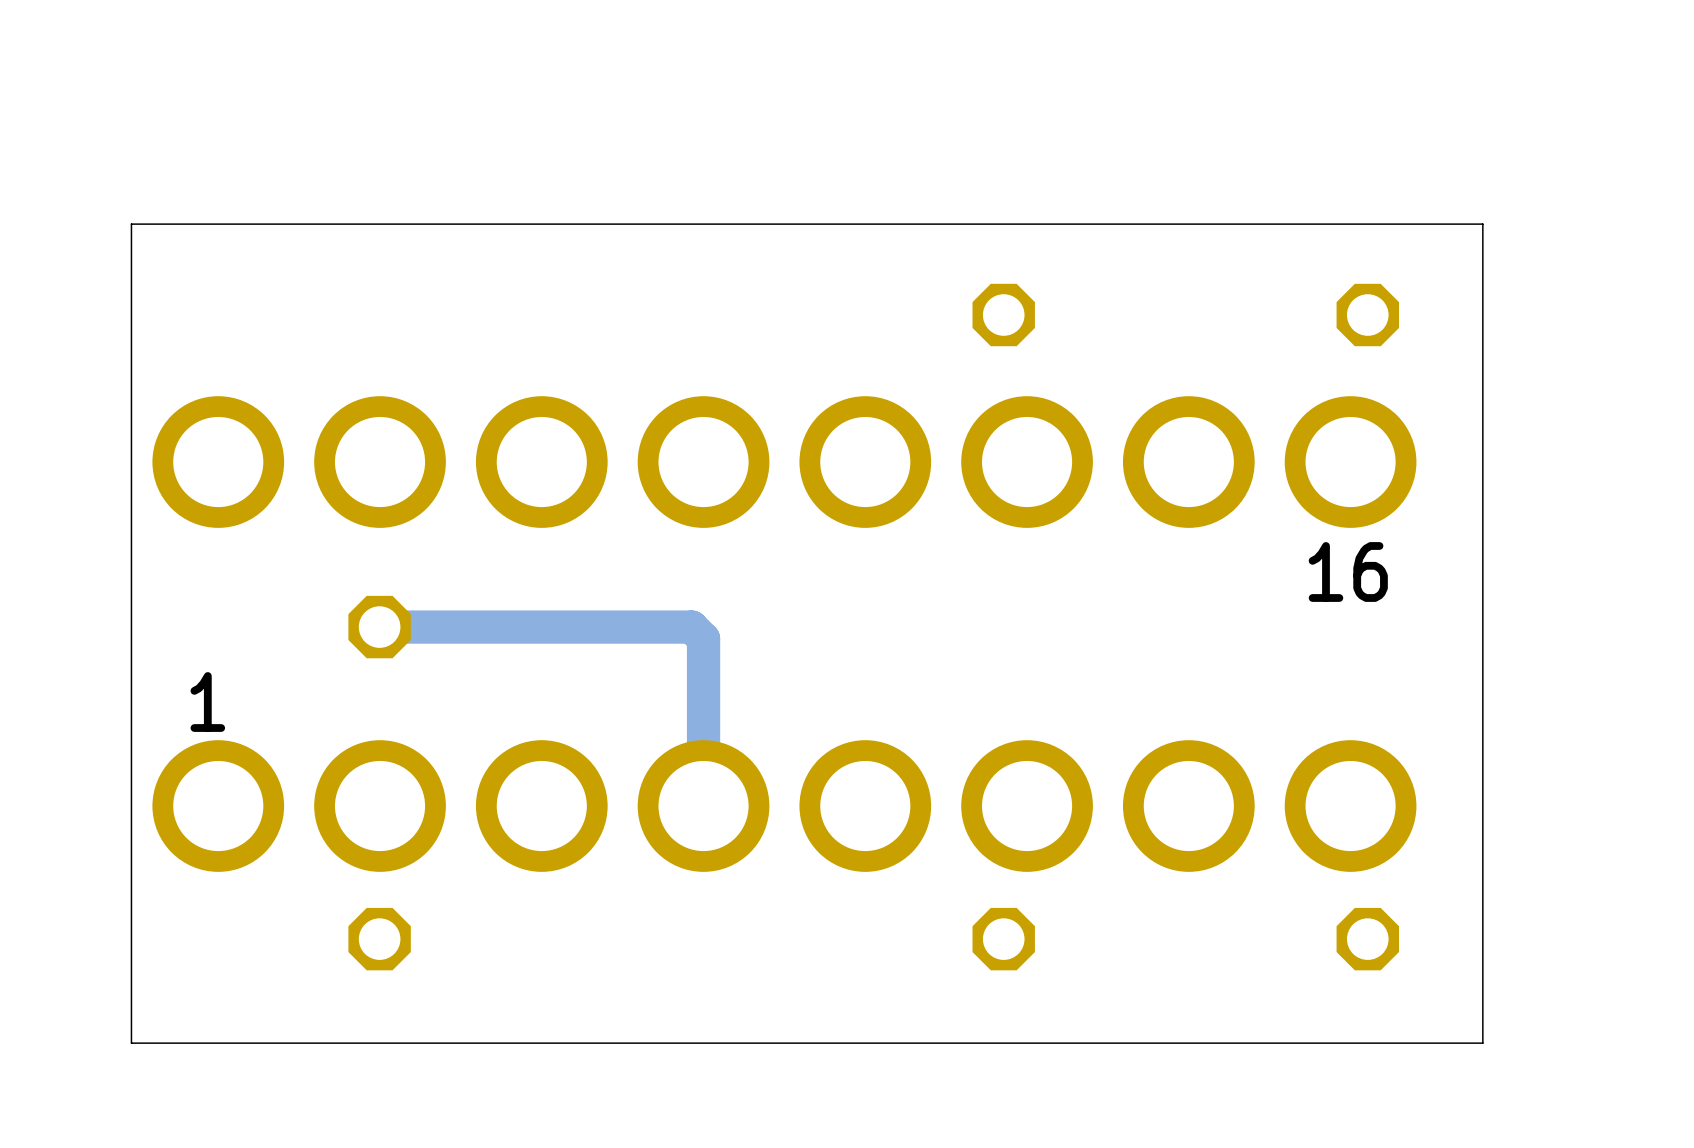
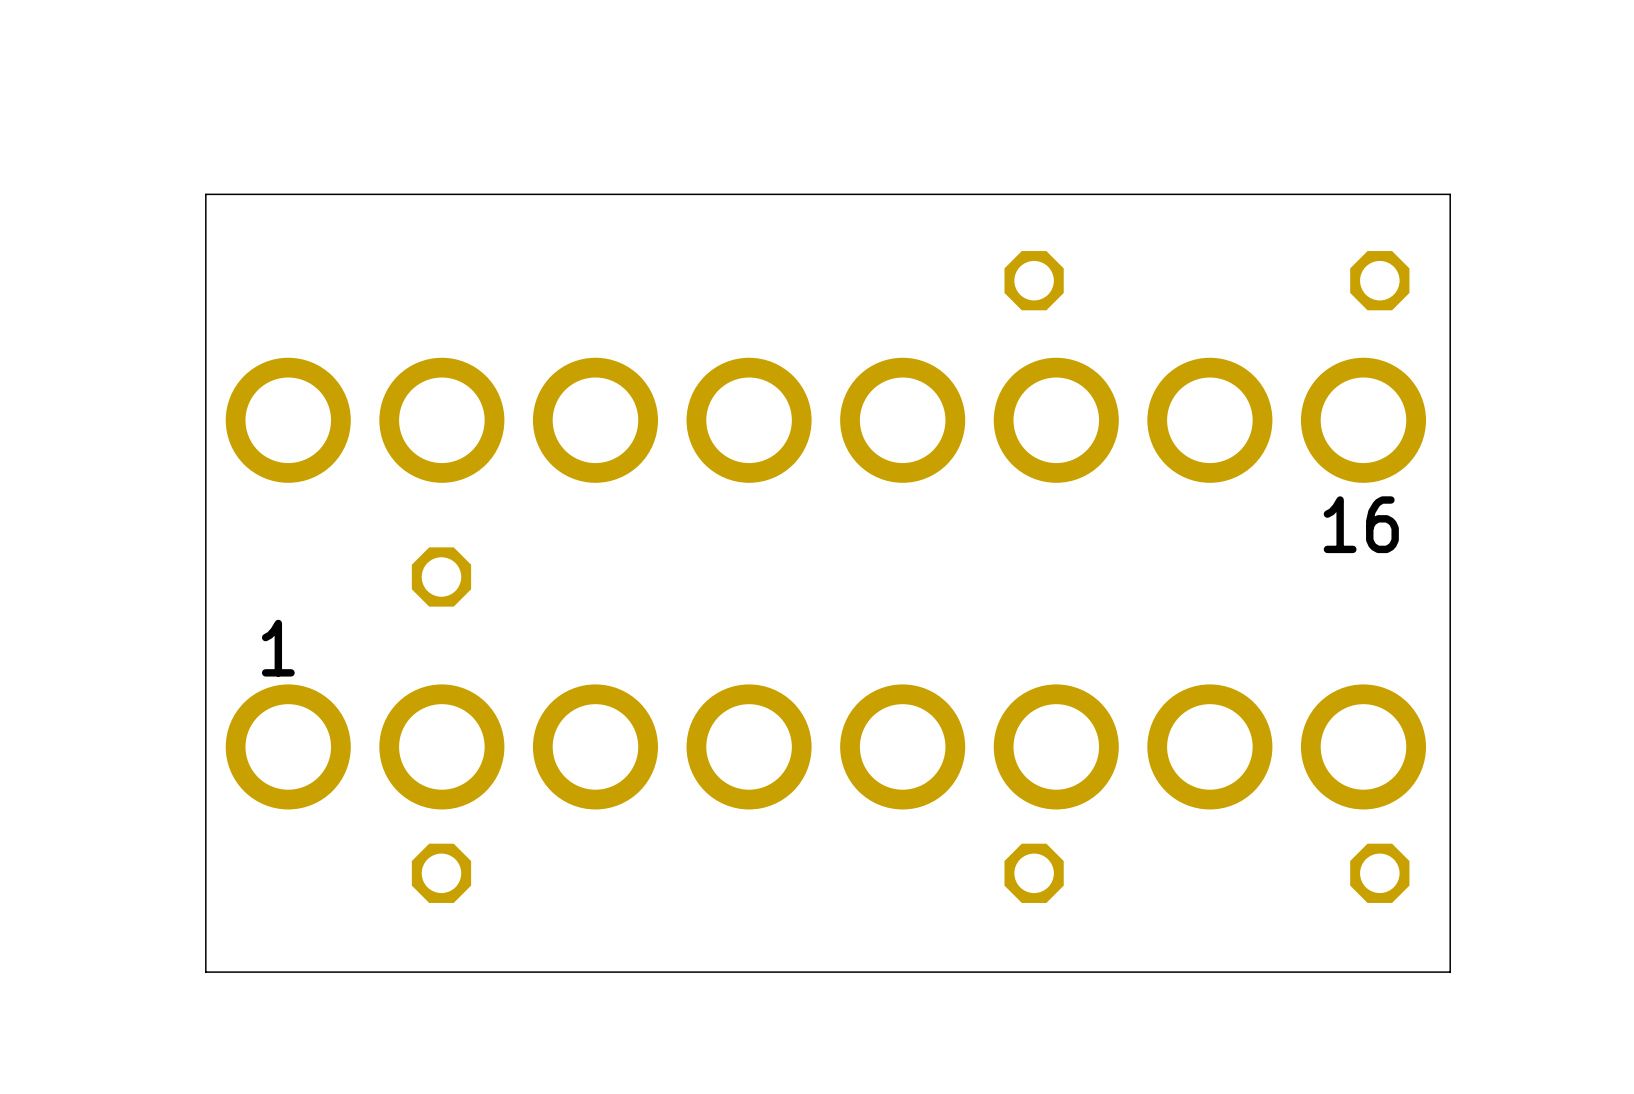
board edge: (1441, 224) (1482, 224) (1482, 1043) (1441, 1043) -> (1450, 194) (1450, 972)
track: (379, 627) (691, 627) (703, 638) (703, 806) -> none

